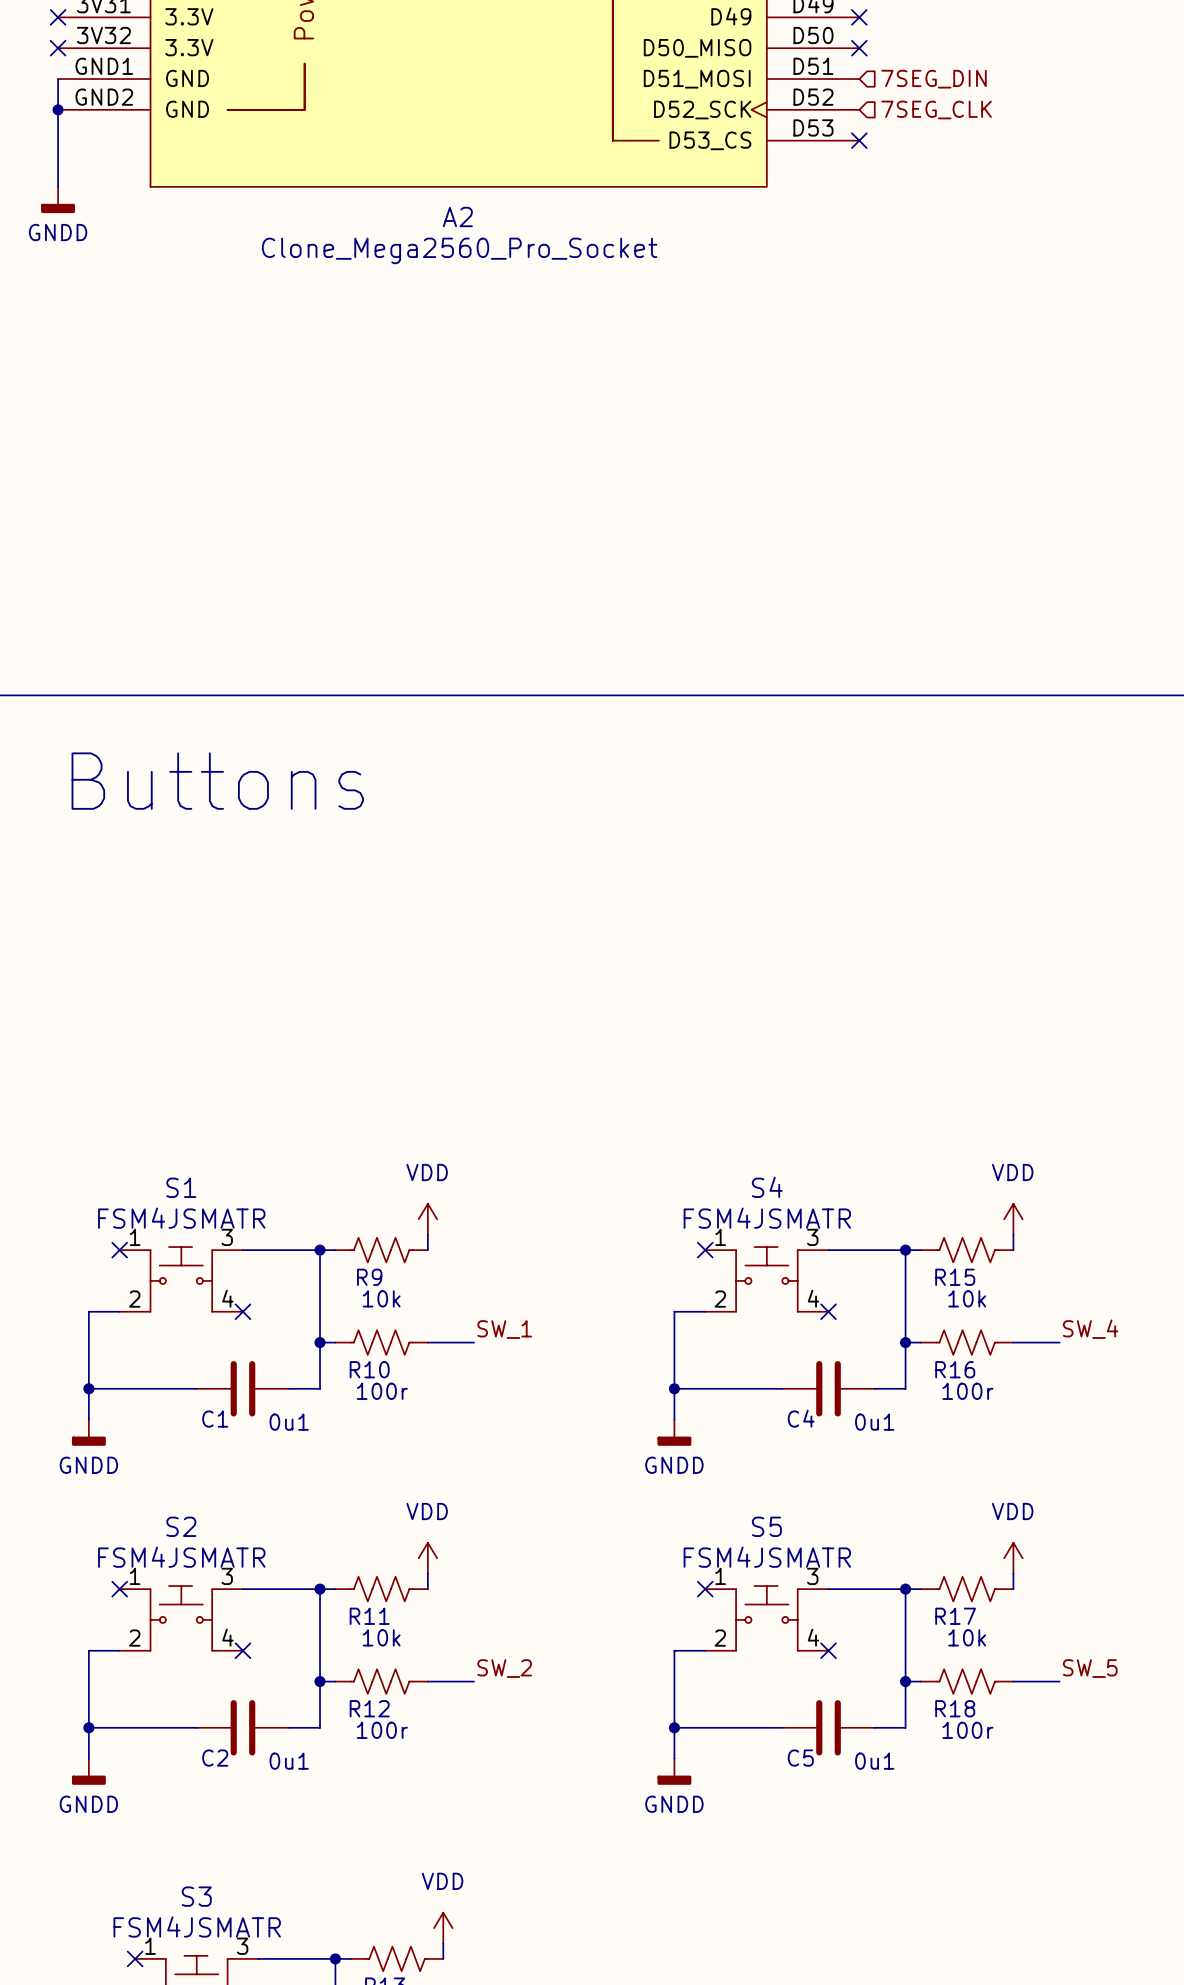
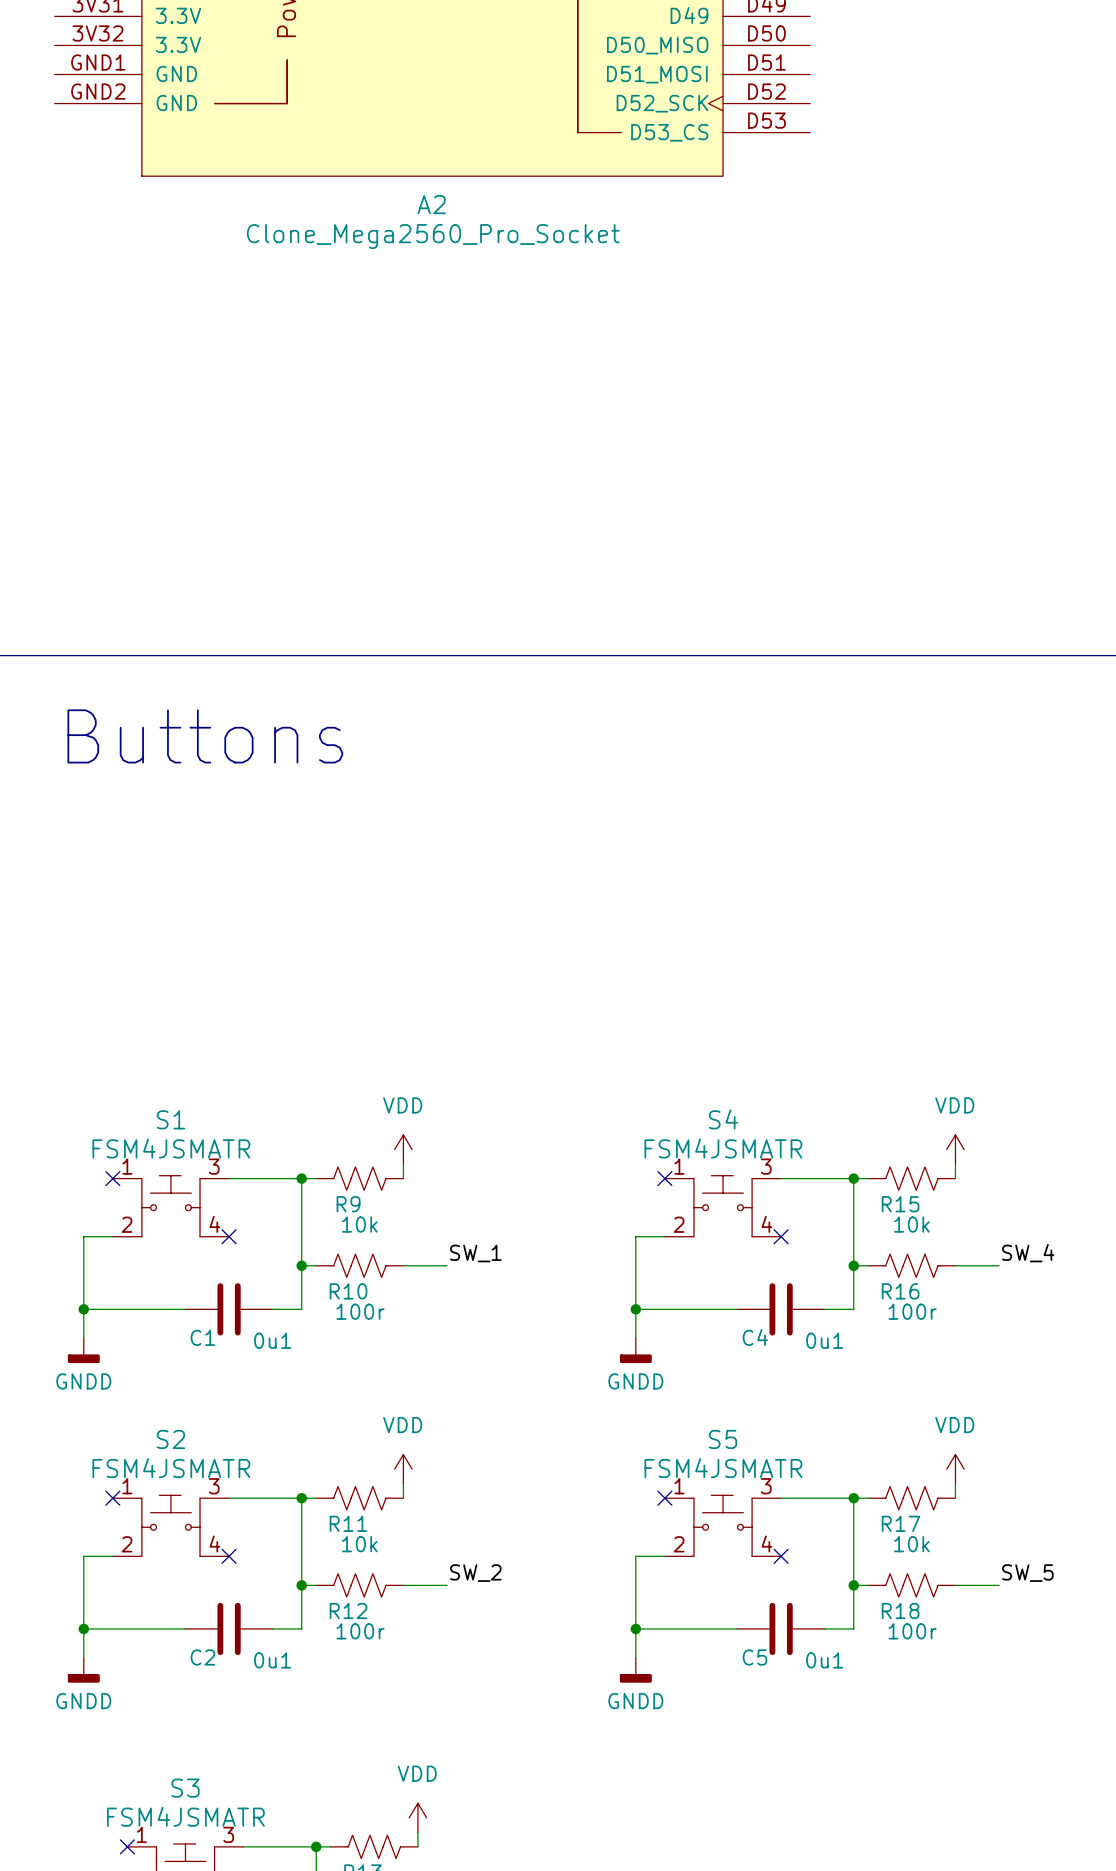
no-connect mark: (58, 17) -> none
no-connect mark: (859, 17) -> none
no-connect mark: (58, 48) -> none
no-connect mark: (859, 48) -> none
wire: (58, 79) (58, 186) -> none
hierarchical label: 7SEG_DIN (934, 79) -> none
junction: (58, 109) -> none
hierarchical label: 7SEG_CLK (936, 109) -> none
no-connect mark: (859, 140) -> none
power symbol: GNDD (58, 199) -> none

